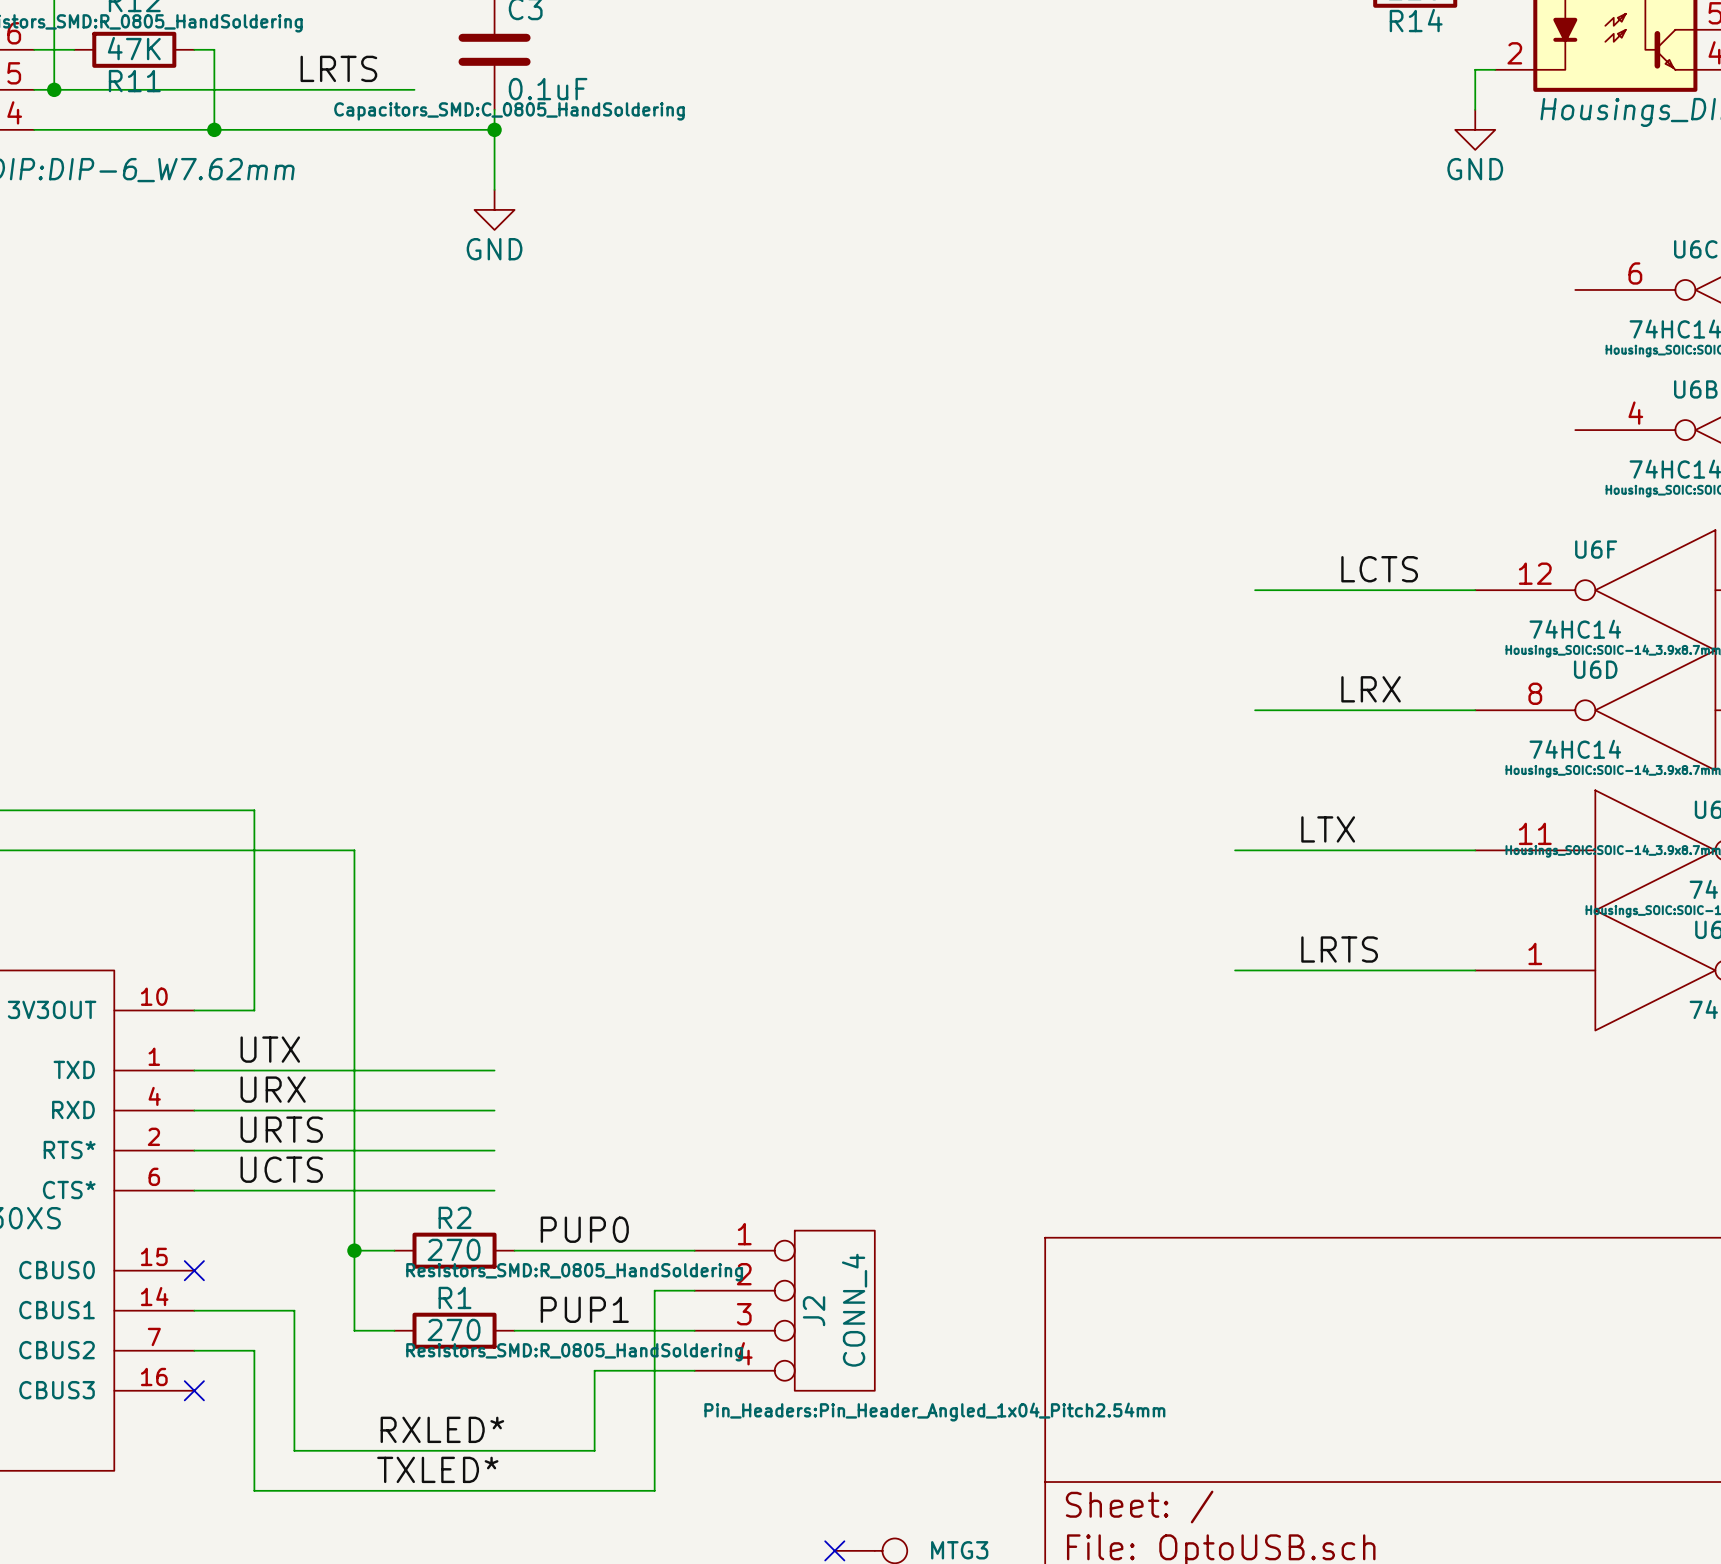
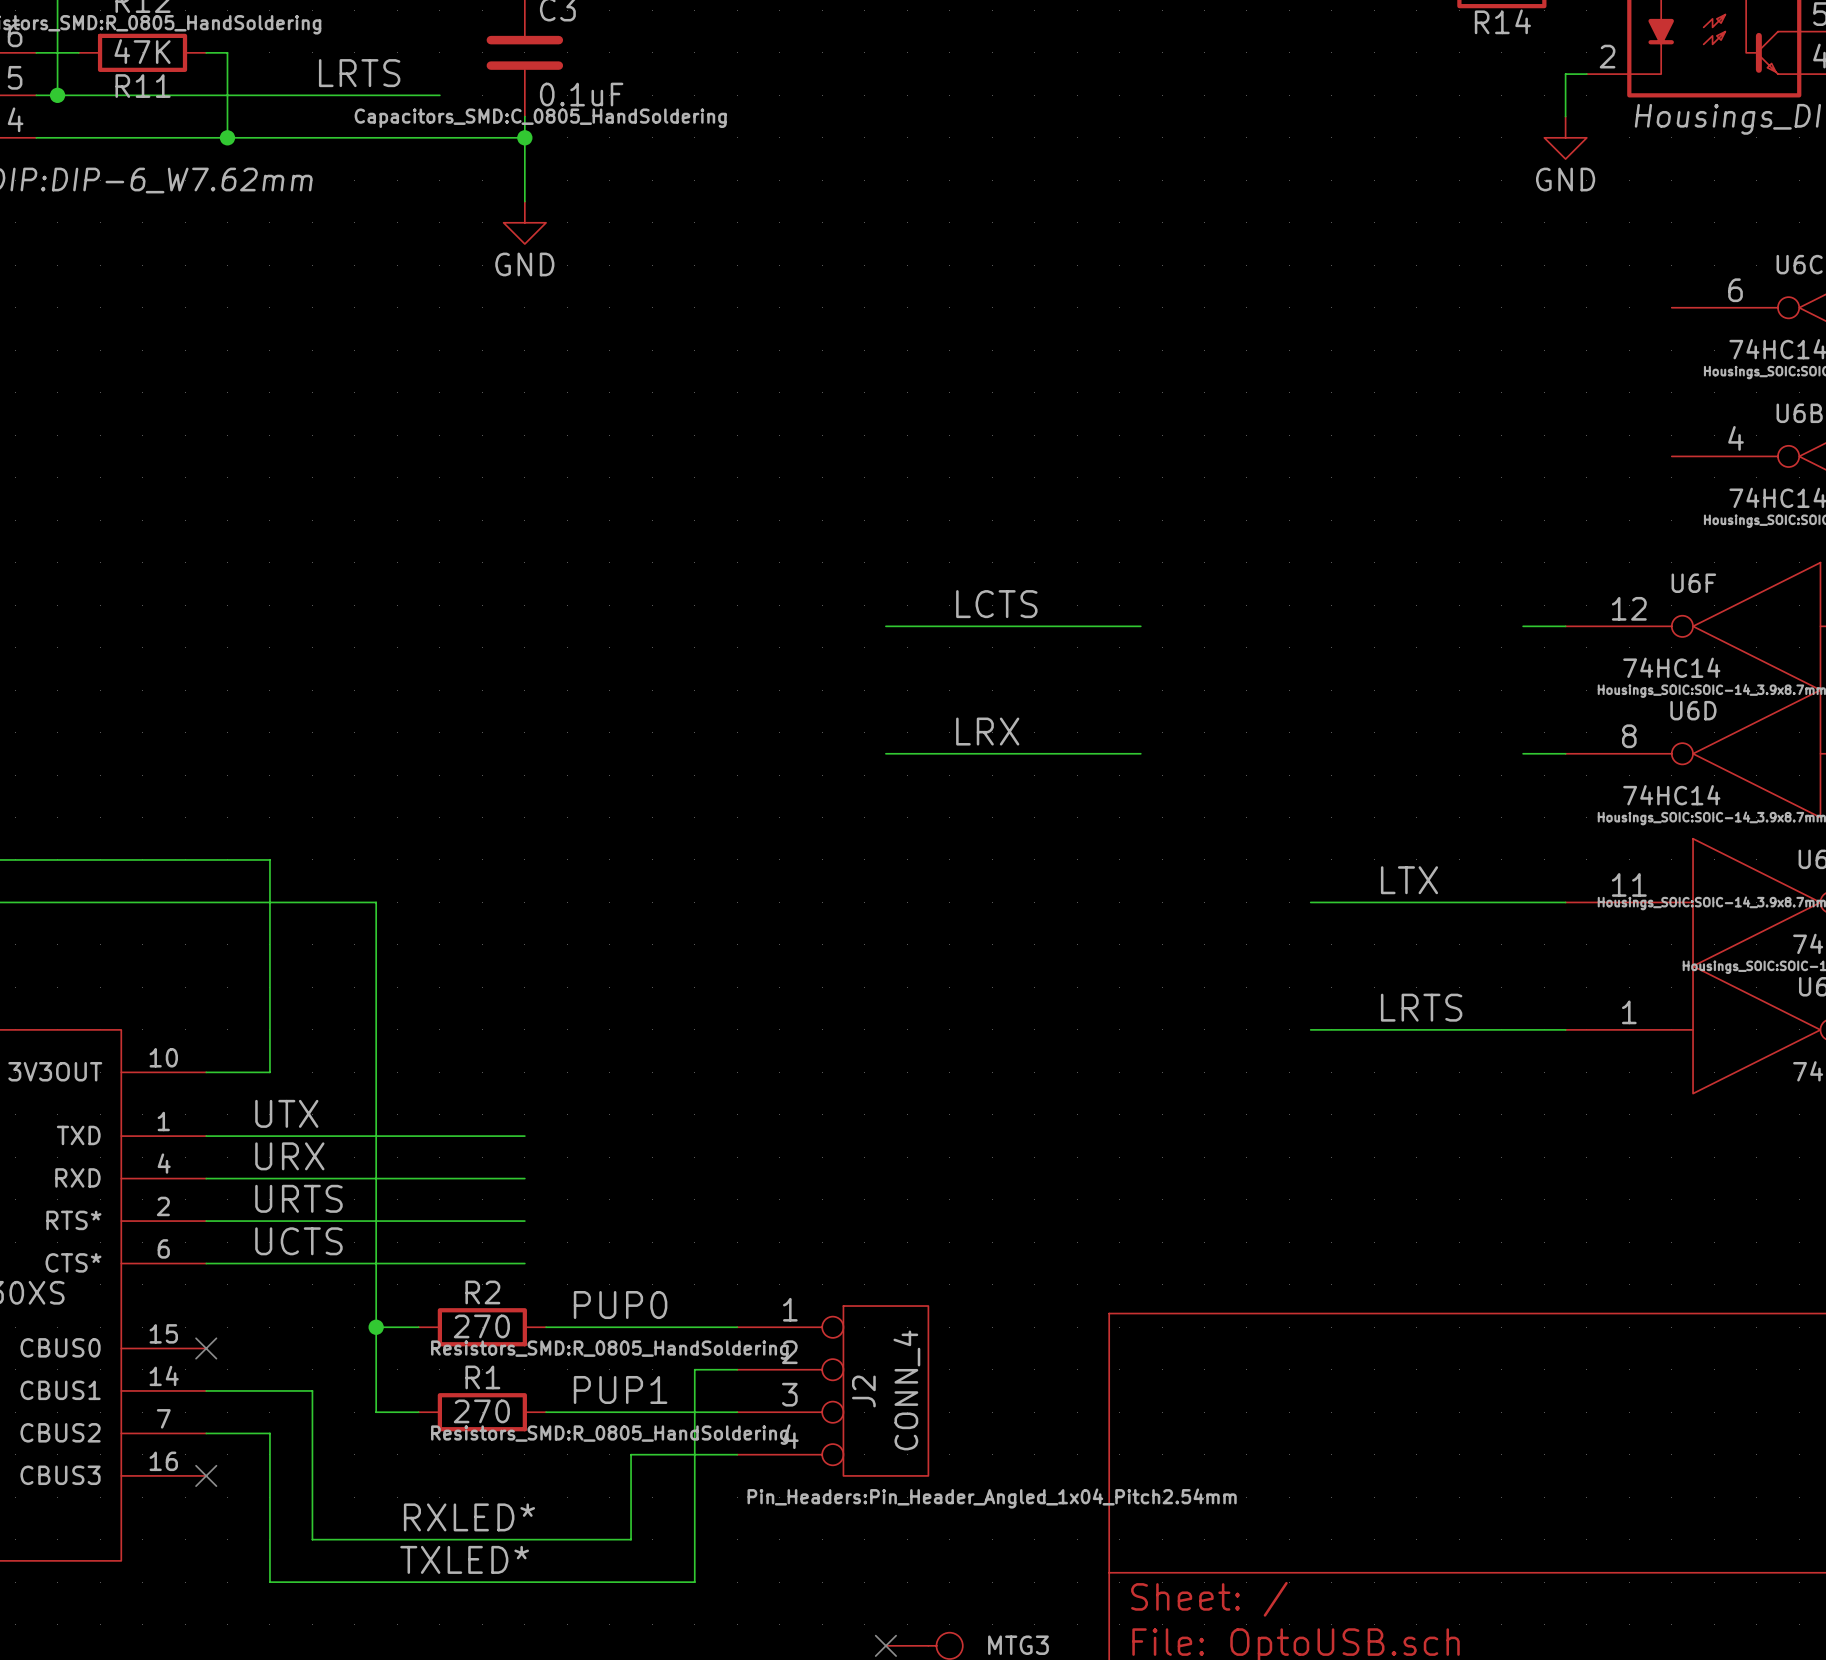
label: none -> LCTS (996, 604)
label: LCTS (1379, 569) -> none
wire: none -> (885, 626) (1140, 626)
wire: (1255, 590) (1435, 590) -> none
label: none -> LRX (987, 731)
label: LRX (1371, 689) -> none
wire: none -> (885, 753) (1140, 753)
wire: (1255, 710) (1435, 710) -> none

